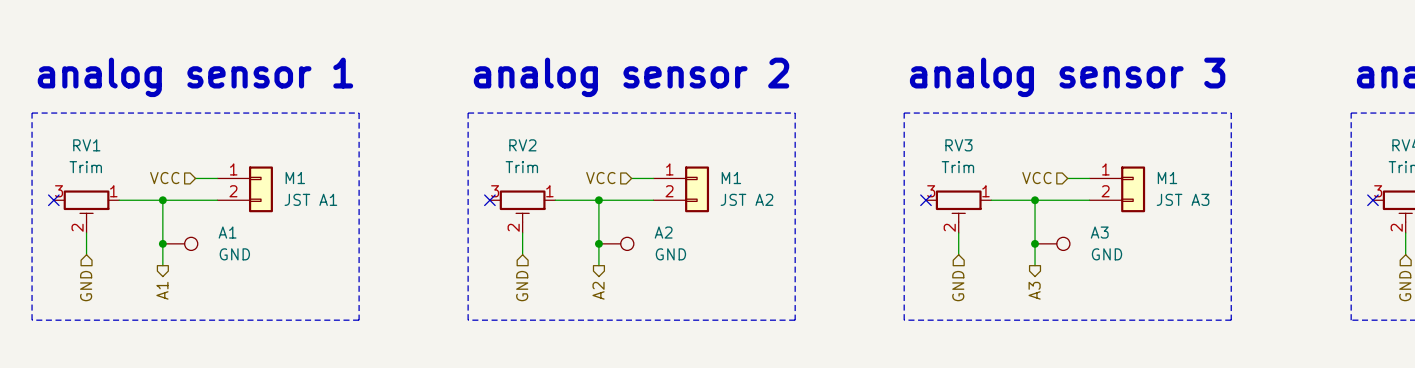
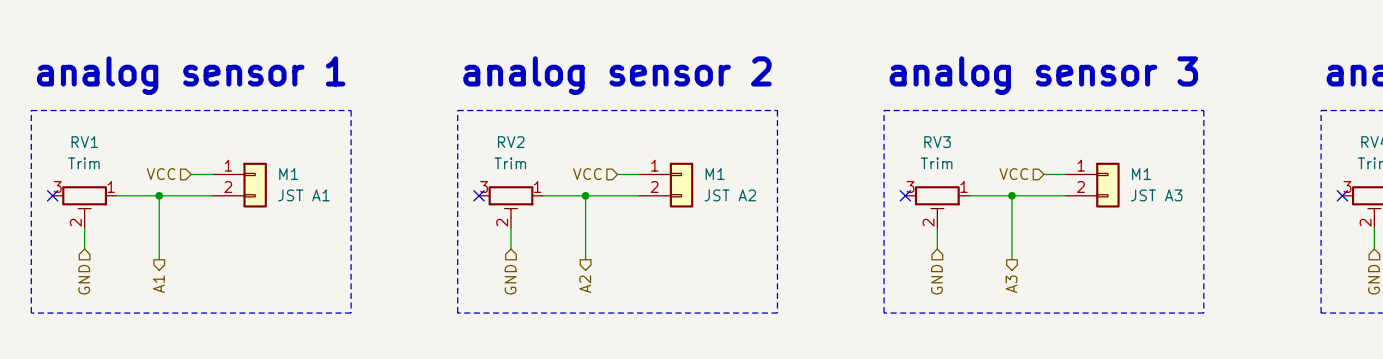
junction: (162, 243) -> none
GND: A1 (180, 243) -> none
junction: (598, 243) -> none
GND: A2 (616, 243) -> none
junction: (1035, 243) -> none
GND: A3 (1052, 243) -> none

